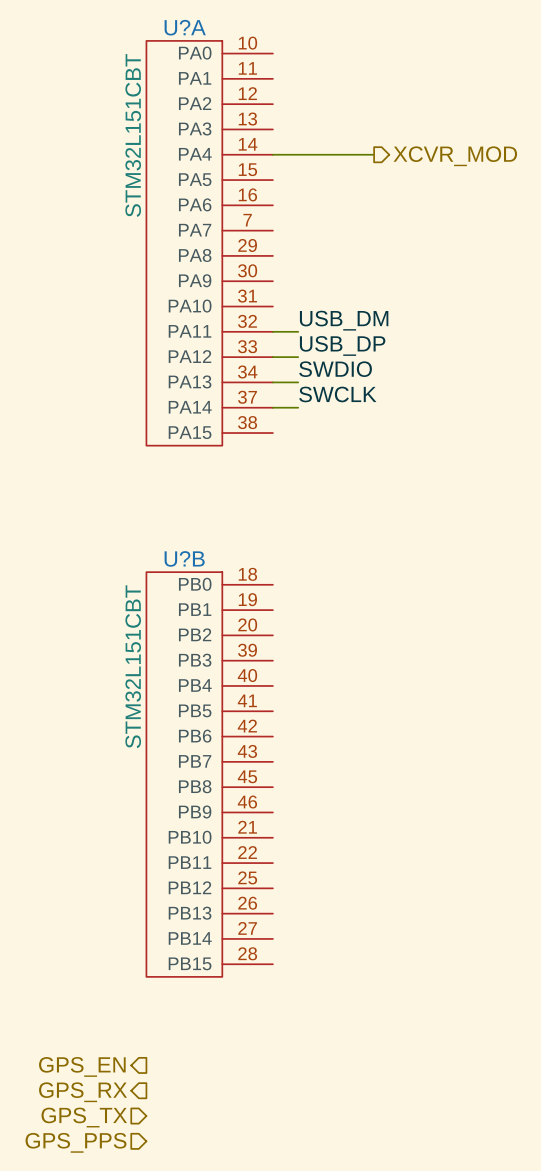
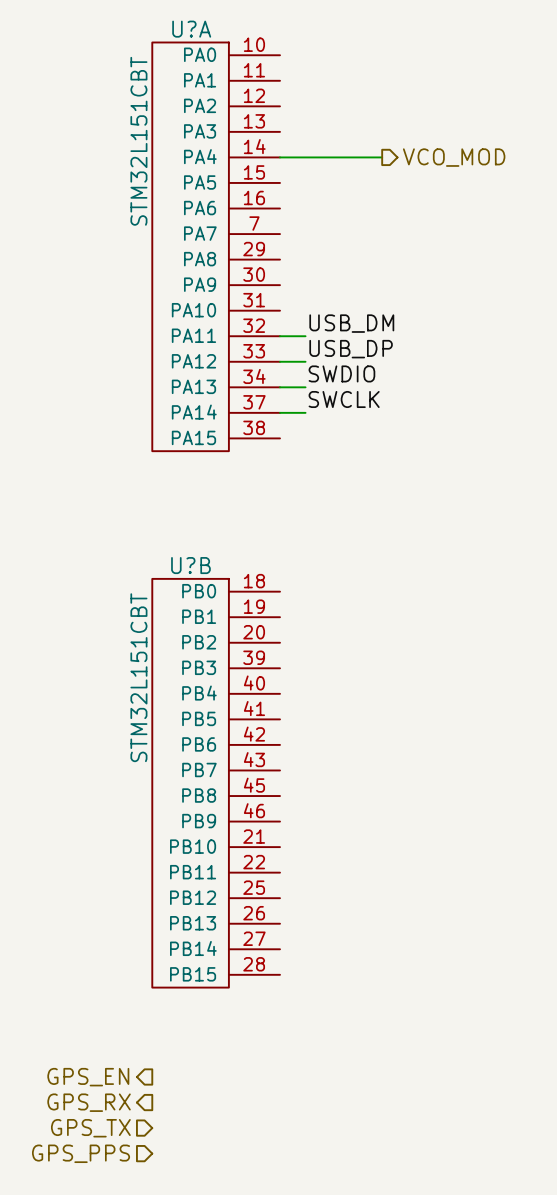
hierarchical label: XCVR_MOD (455, 156) -> VCO_MOD (454, 157)

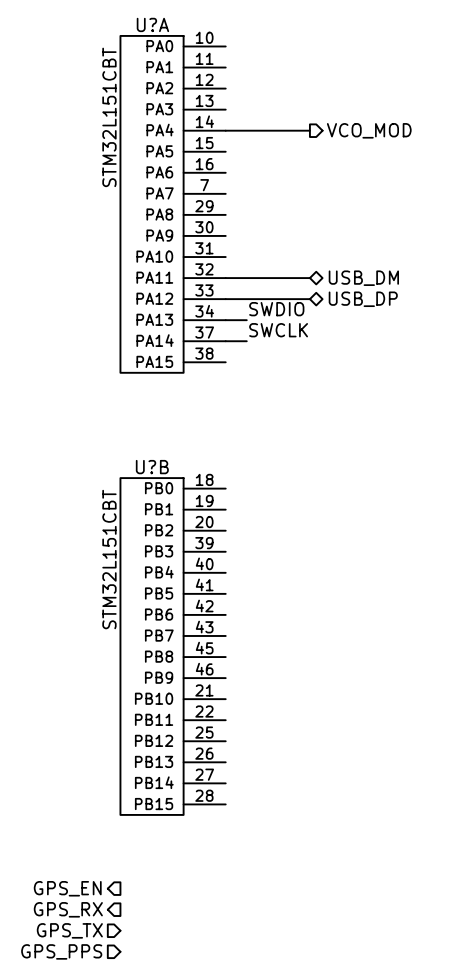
label: USB_DM (351, 323) -> none
wire: none -> (246, 278) (309, 278)
hierarchical label: none -> USB_DM (363, 278)
label: USB_DP (351, 349) -> none
wire: none -> (246, 299) (309, 299)
hierarchical label: none -> USB_DP (363, 299)

